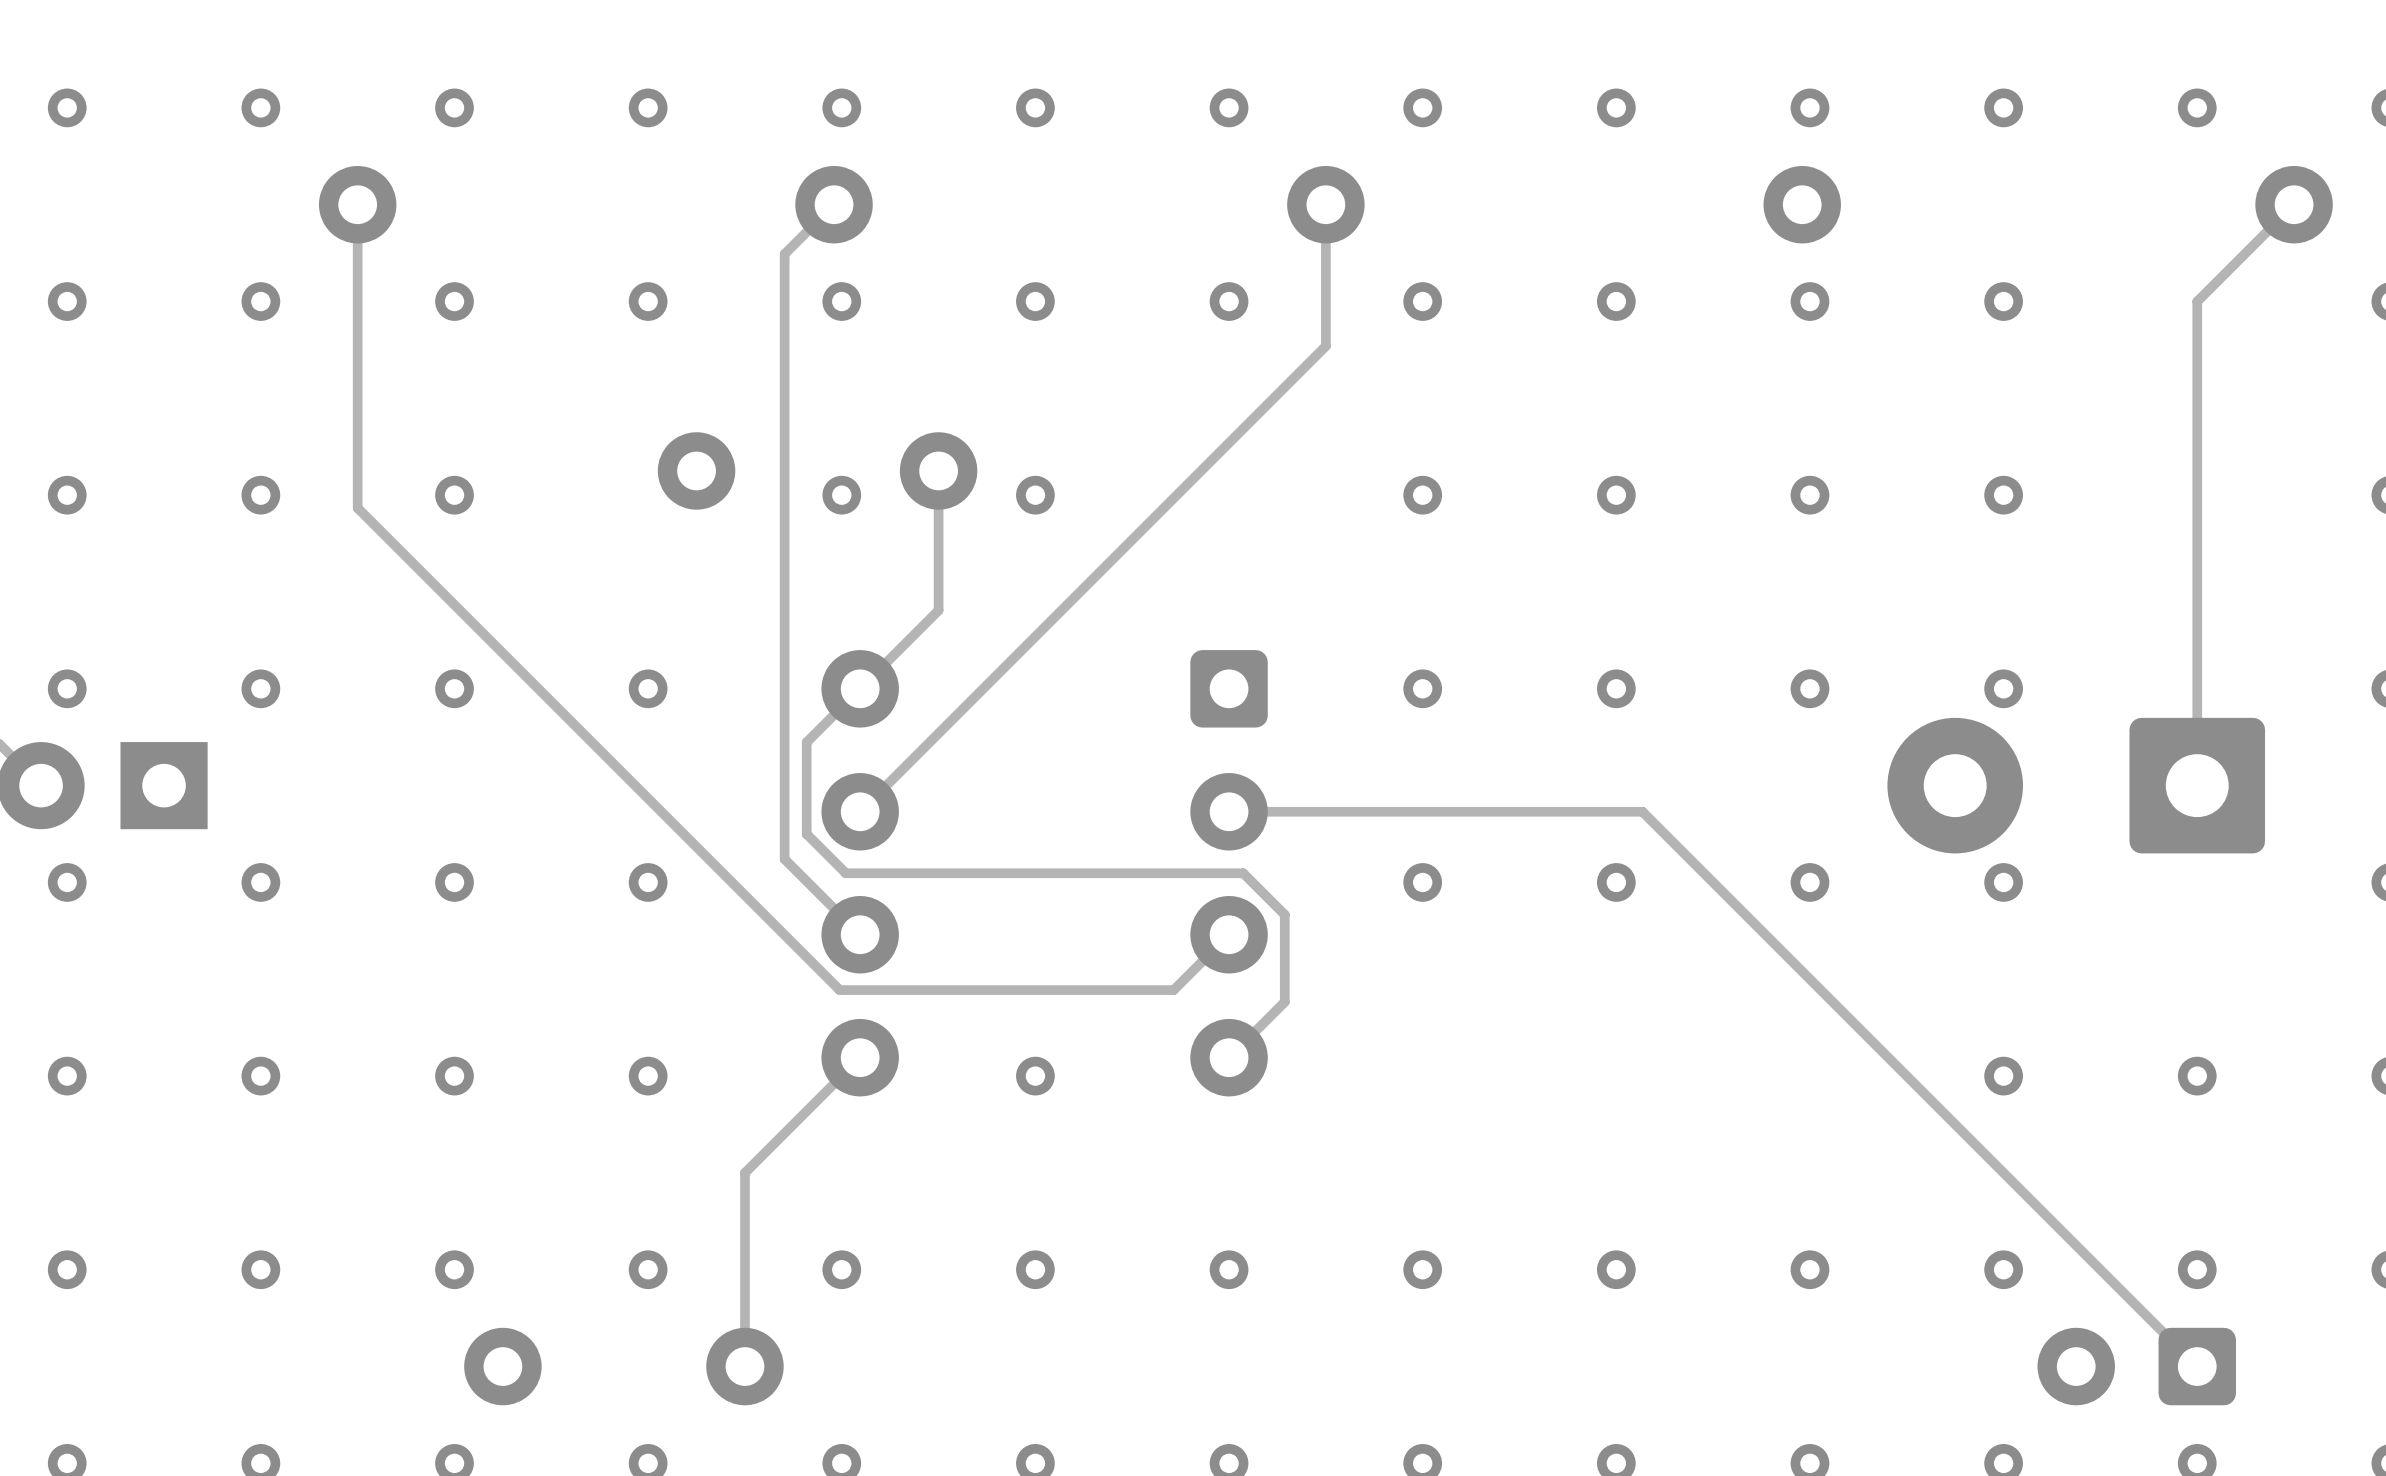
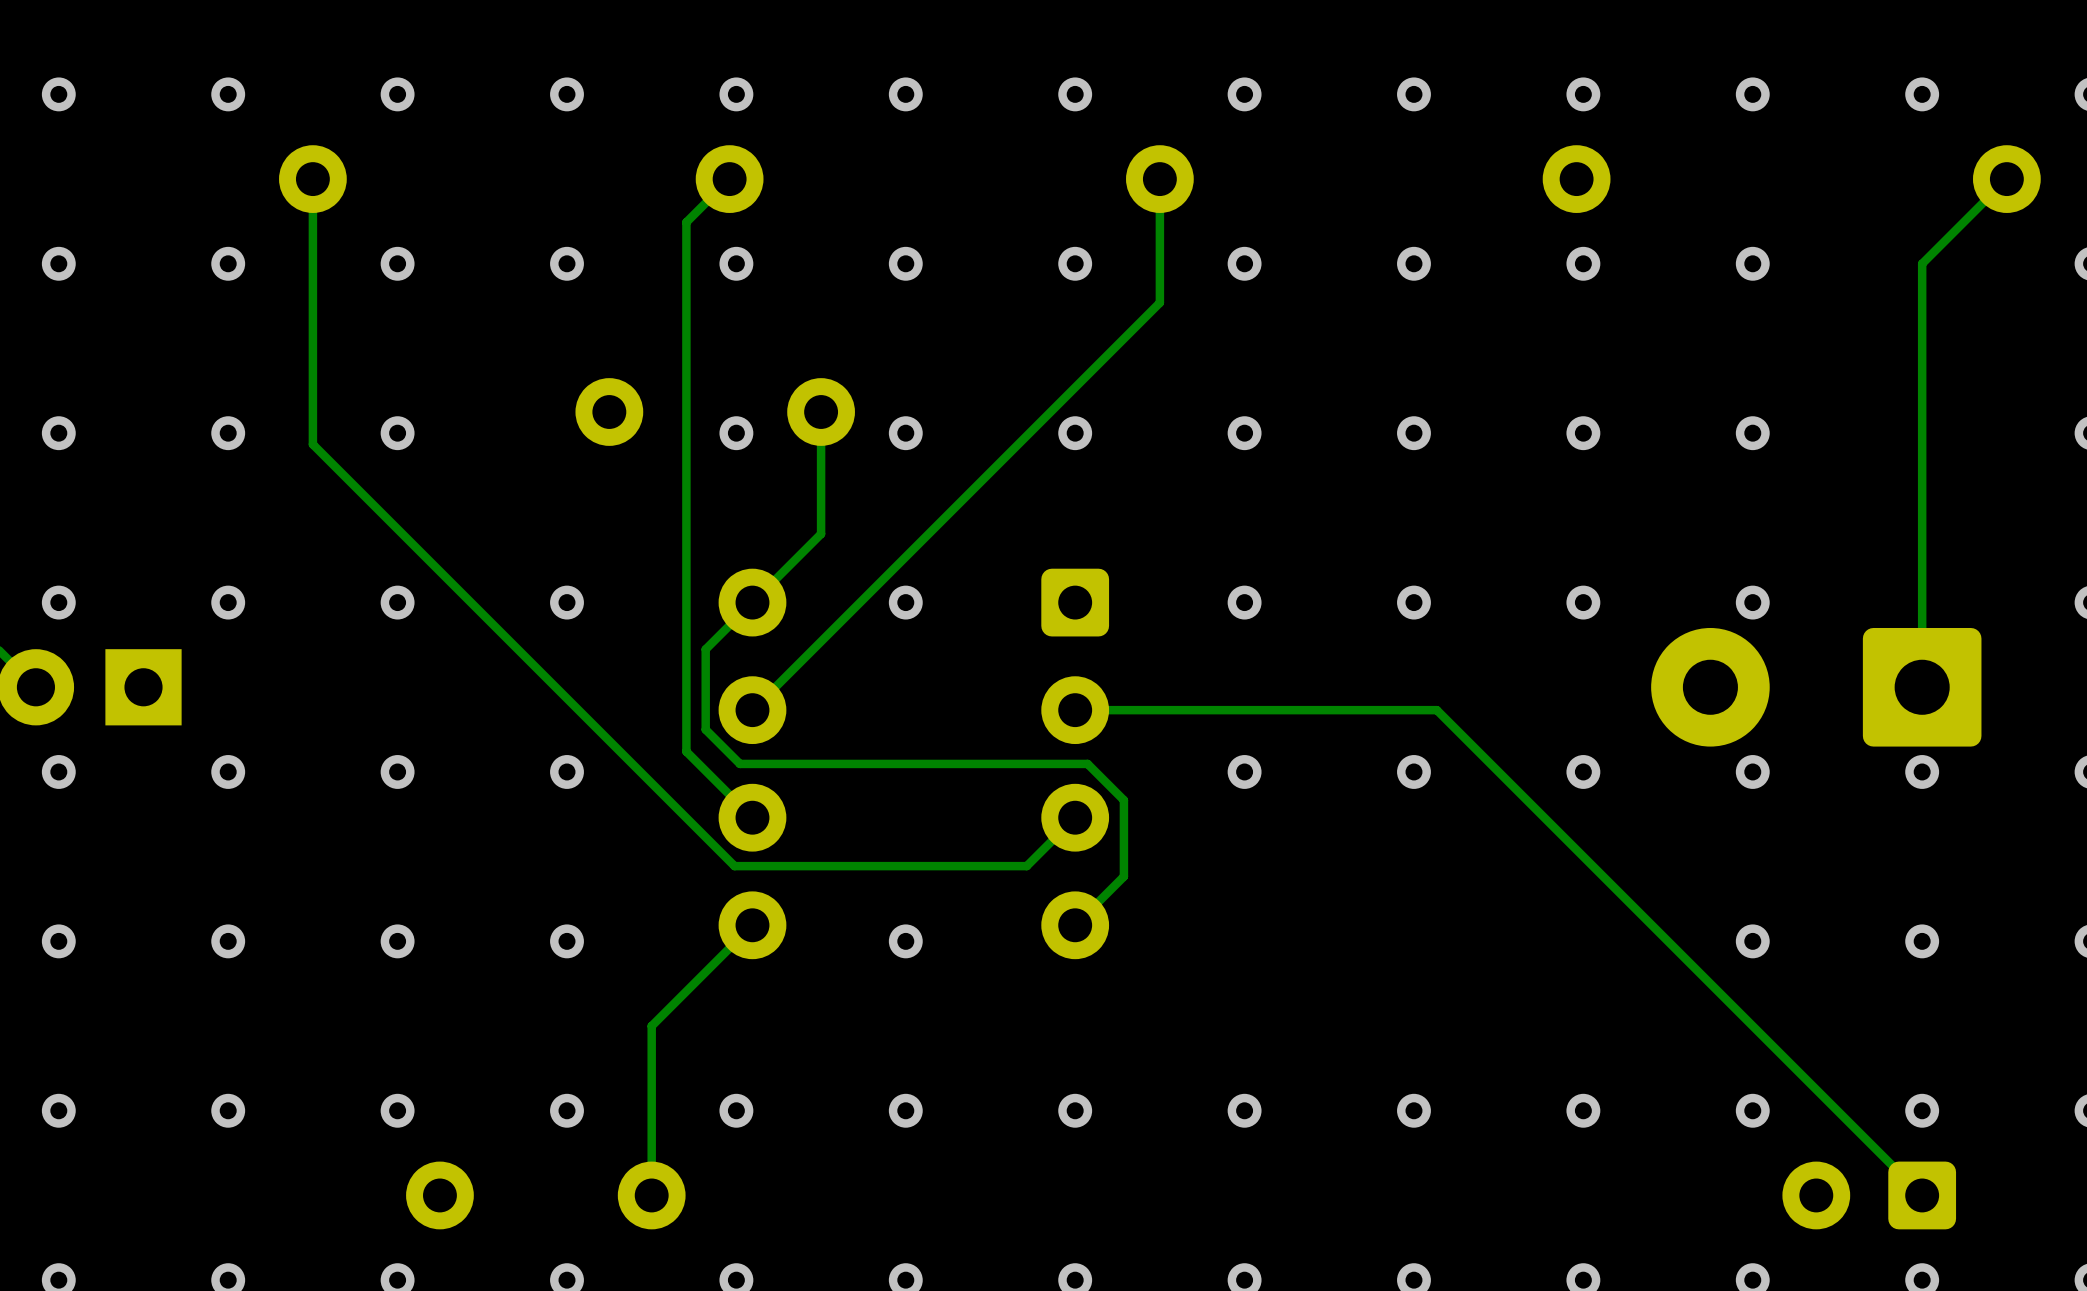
via: none -> (1075, 433)
via: none -> (905, 602)
via: none -> (1922, 771)

